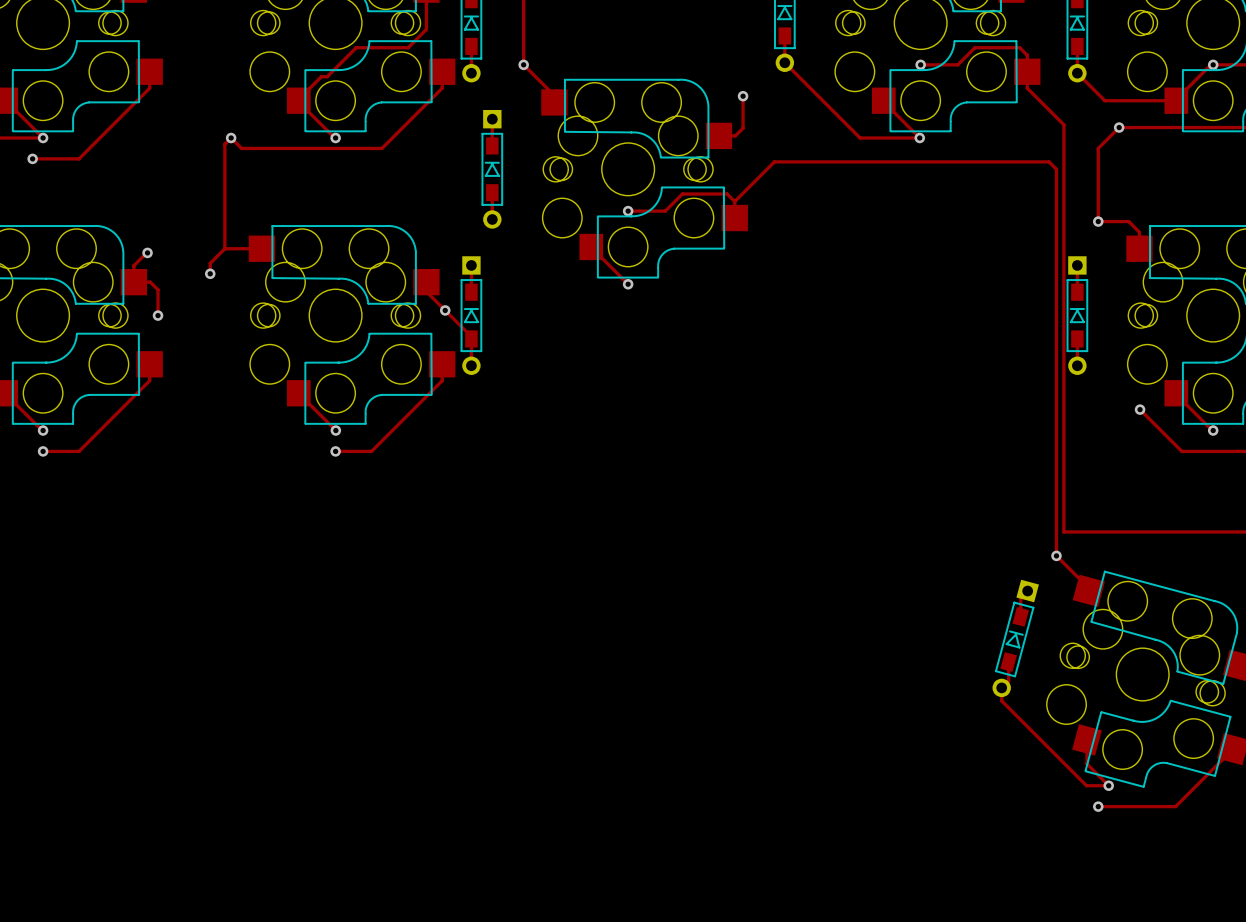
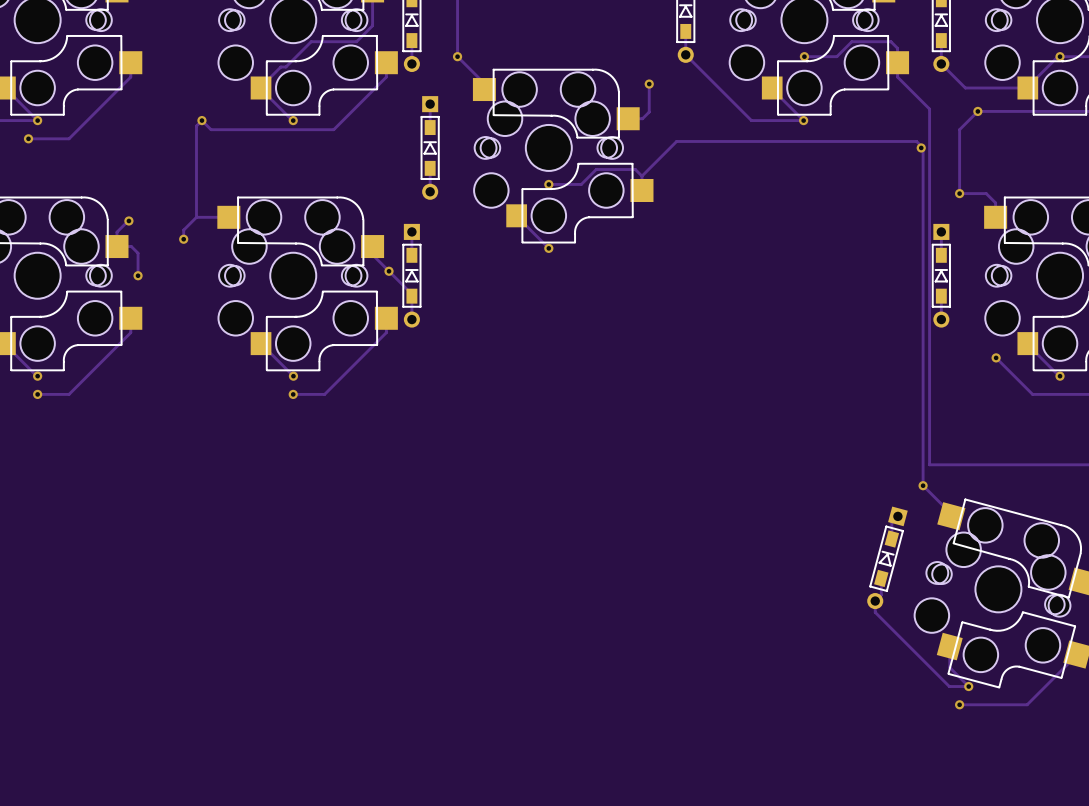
via: none -> (921, 147)

